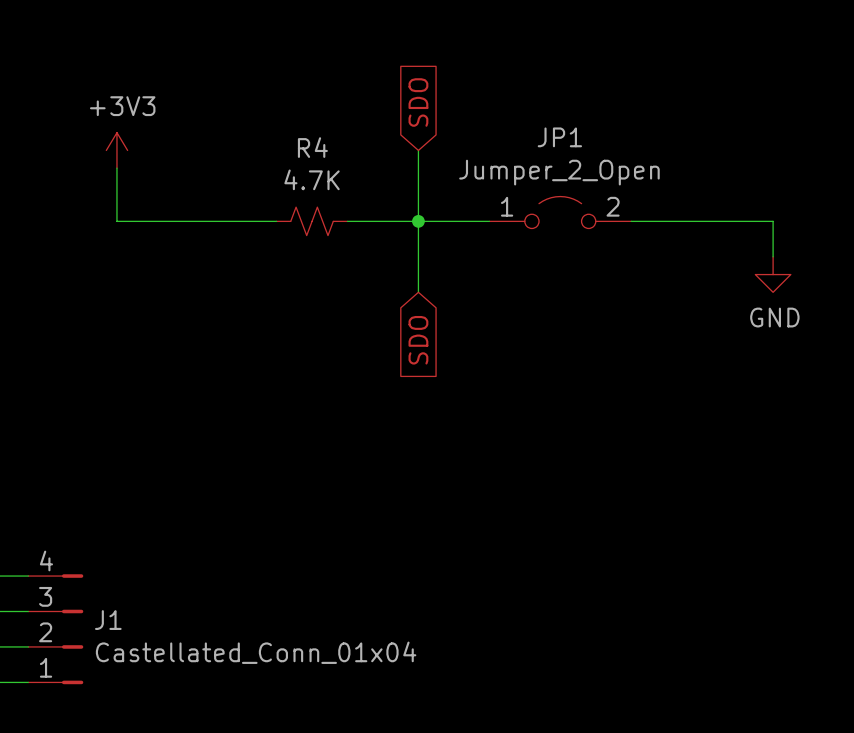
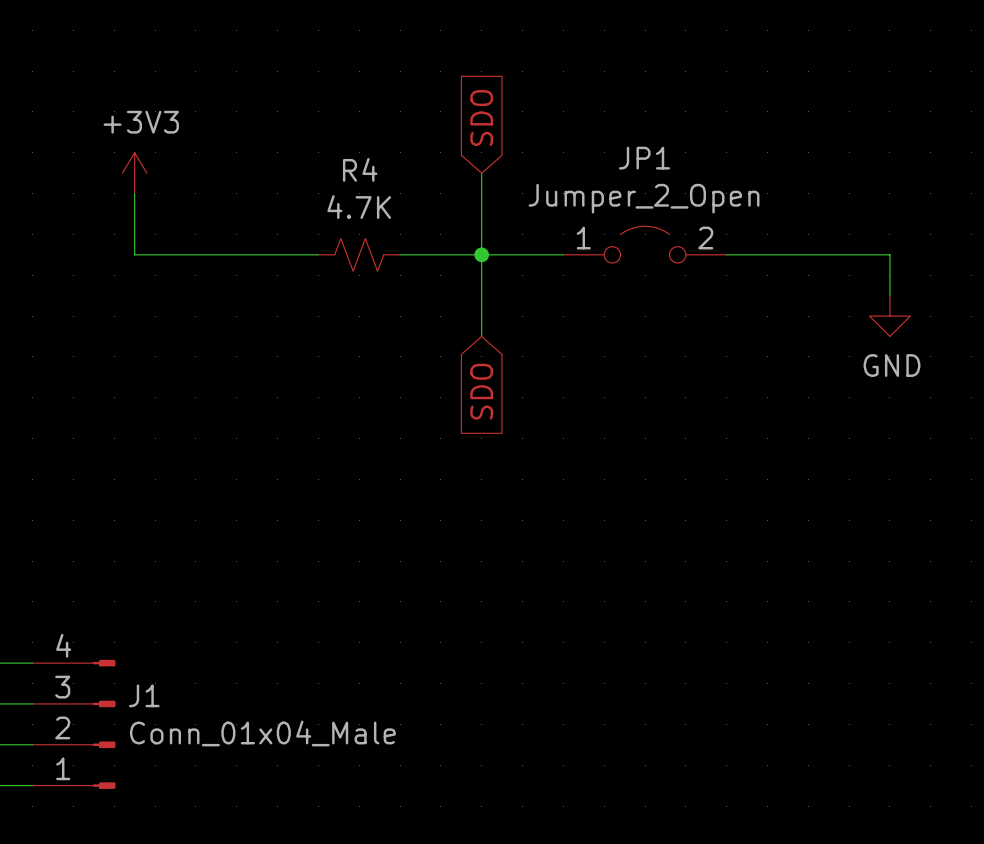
J1 symbol: [28, 574, 84, 685] -> [32, 659, 116, 789]
J1 value: Castellated_Conn_01x04 (256, 652) -> Conn_01x04_Male (262, 733)

